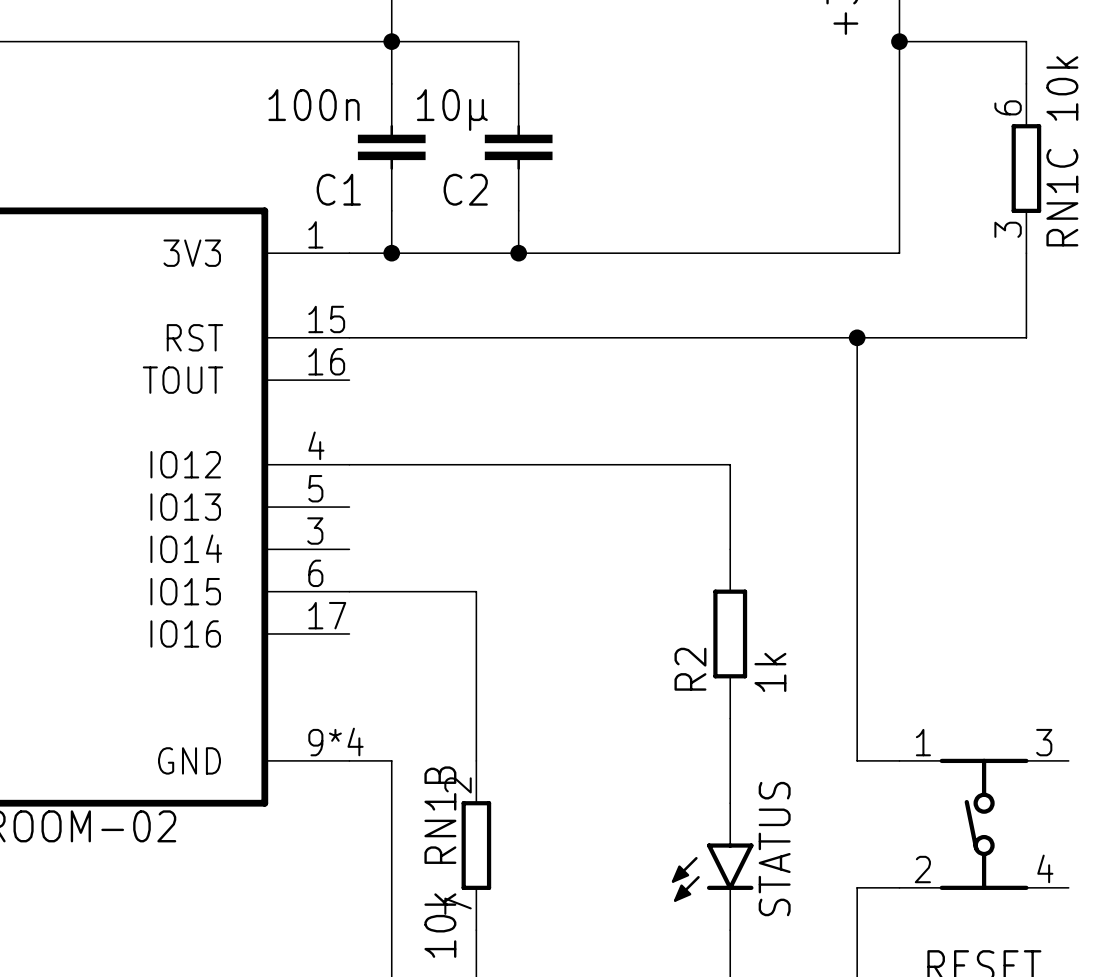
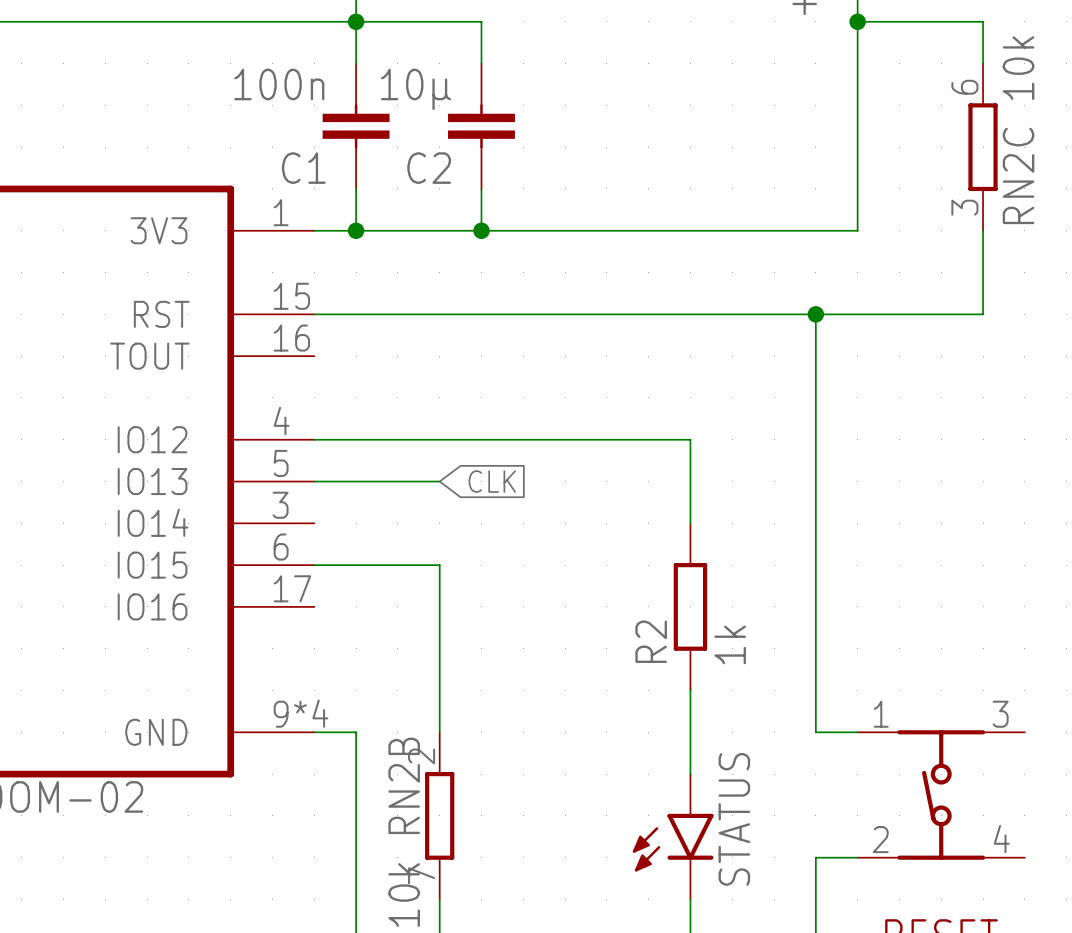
RN1C name: RN1C (1062, 197) -> RN2C (1018, 175)
wire: none -> (314, 481) (439, 481)
global label: none -> CLK (492, 481)
RN1B name: RN1B (440, 815) -> RN2B (404, 785)

